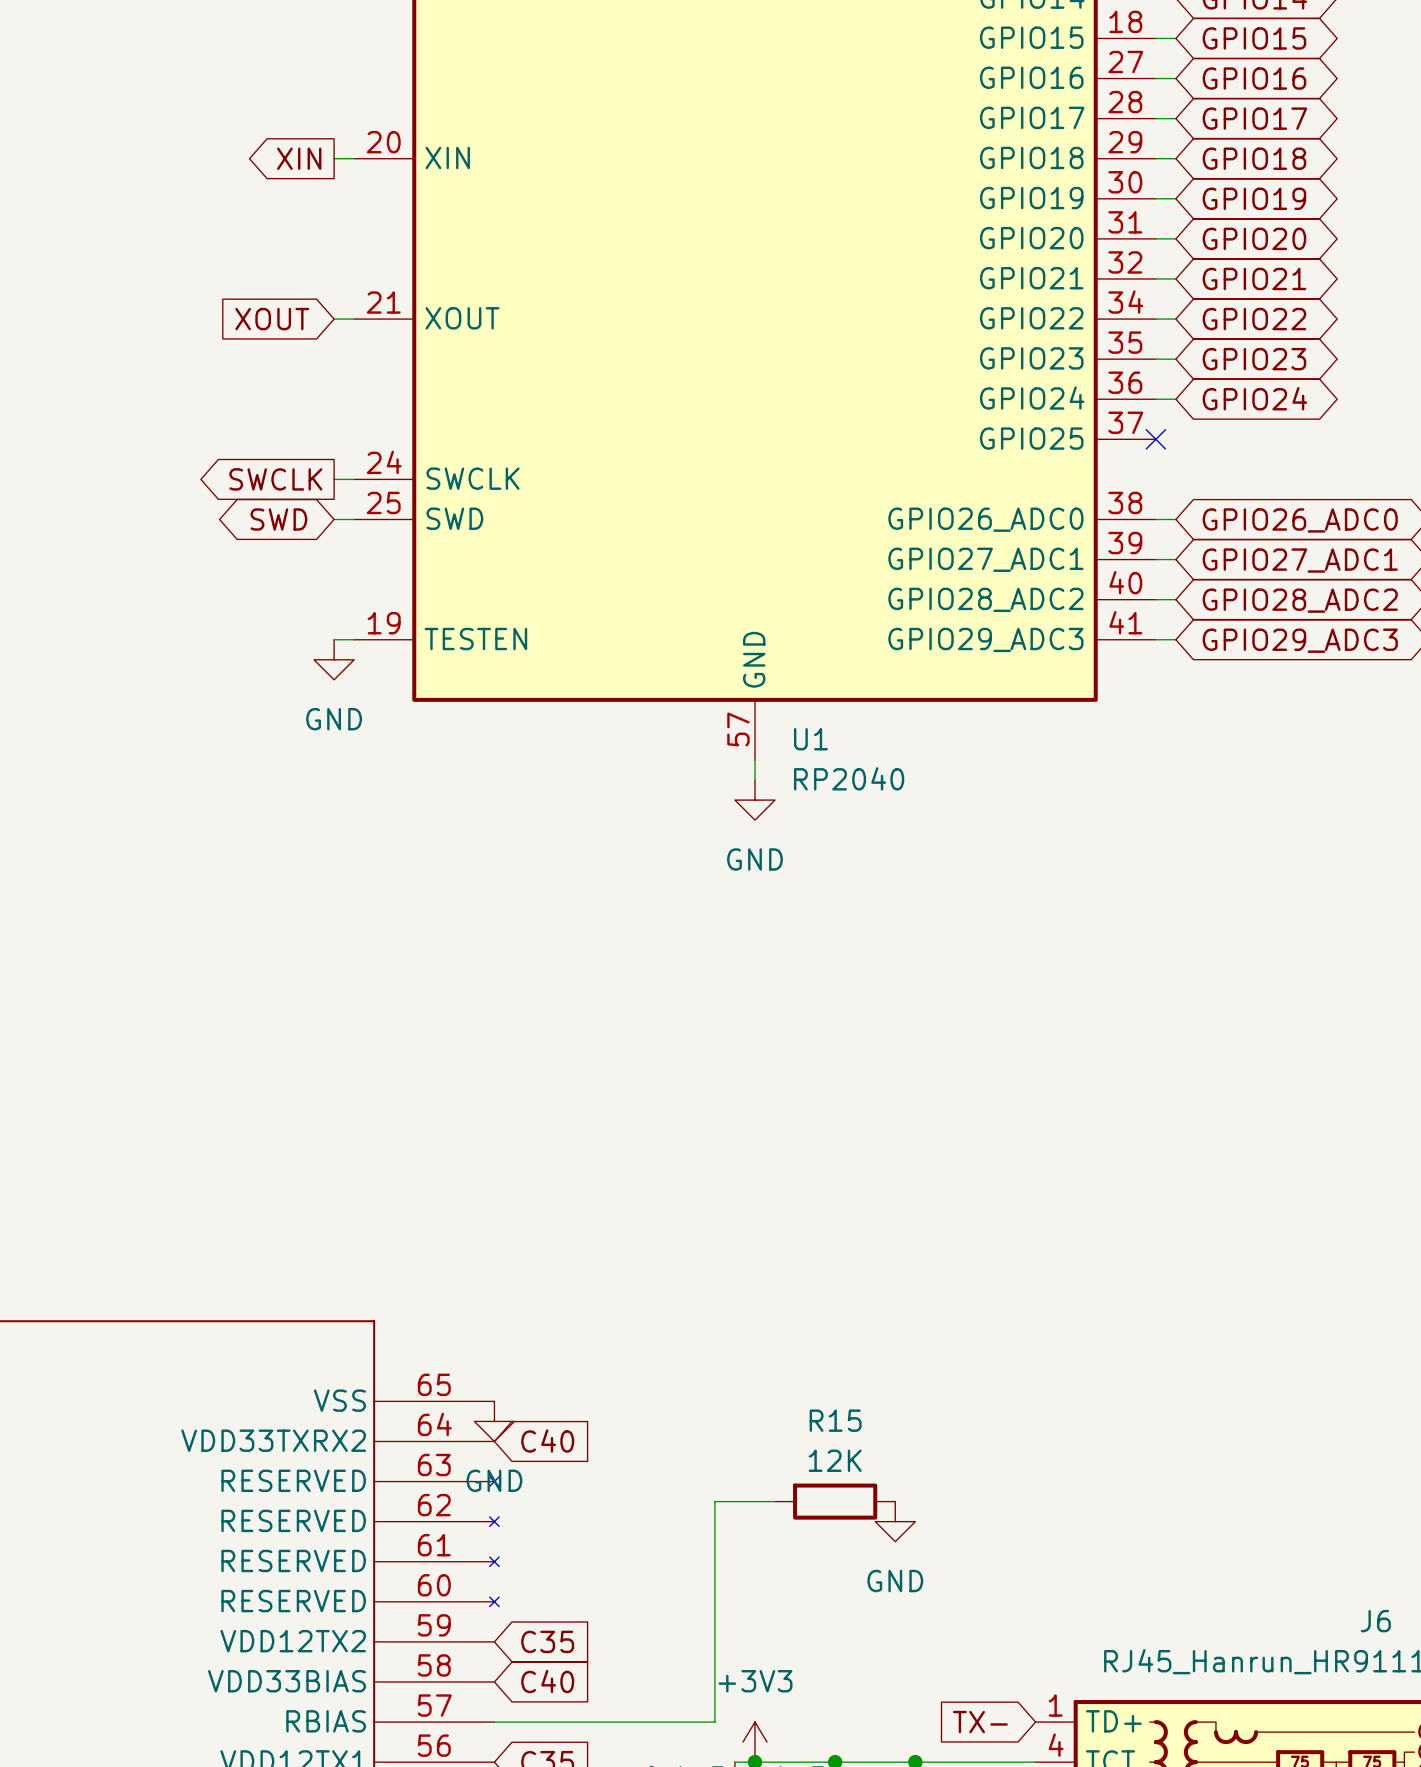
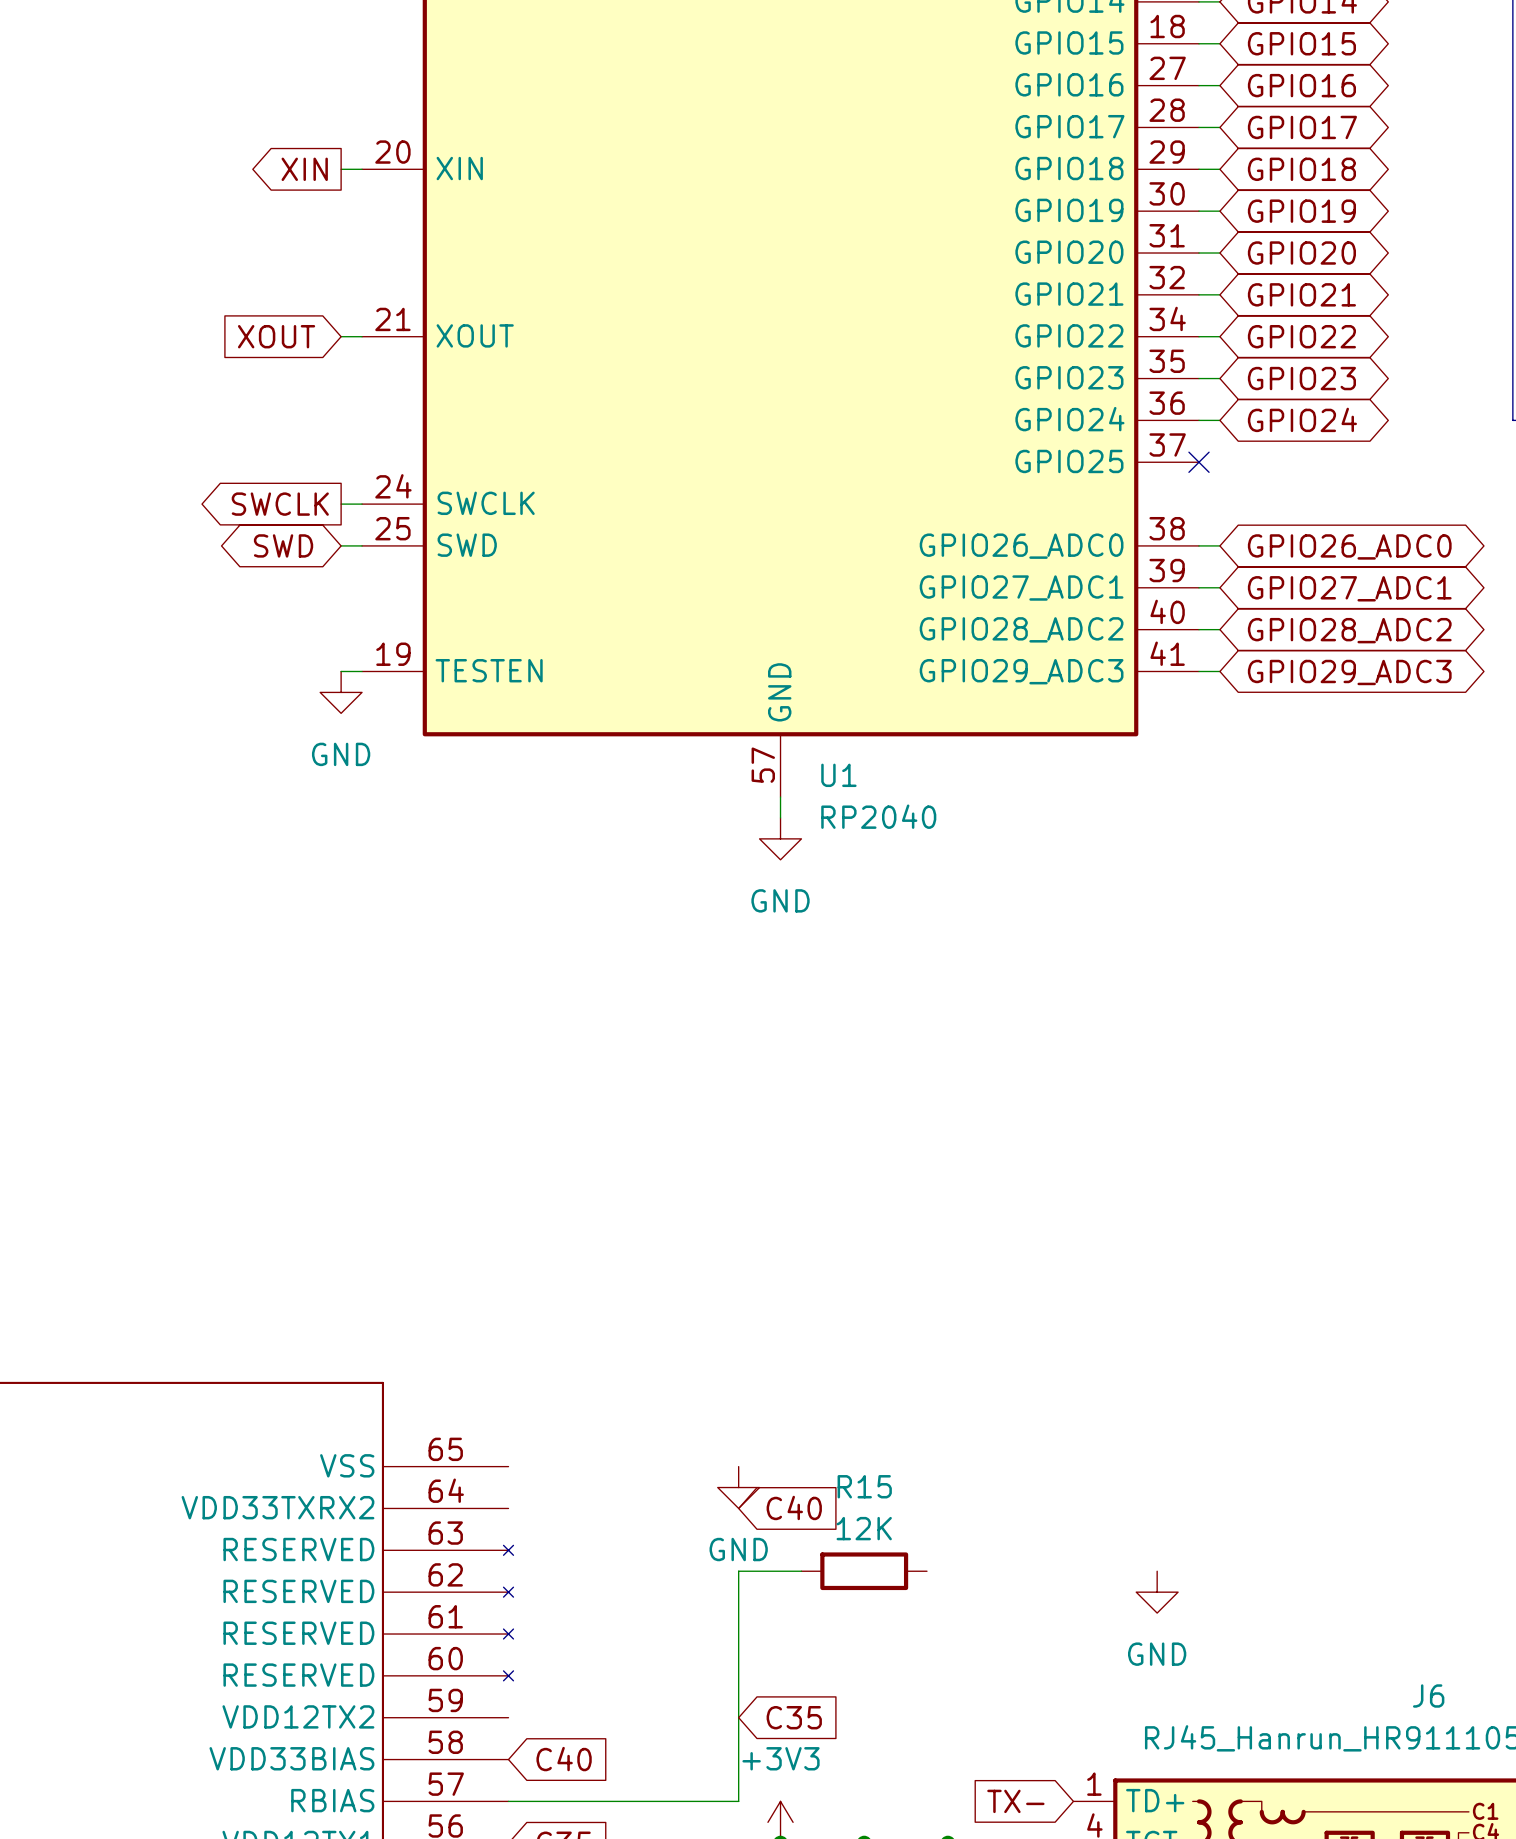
power symbol: GND (494, 1421) -> none
power symbol: none -> GND (738, 1487)
global label position: C40 (547, 1440) -> C40 (794, 1507)
power symbol: GND (895, 1521) -> none
power symbol: none -> GND (1157, 1592)
global label position: C35 (547, 1641) -> C35 (794, 1717)

